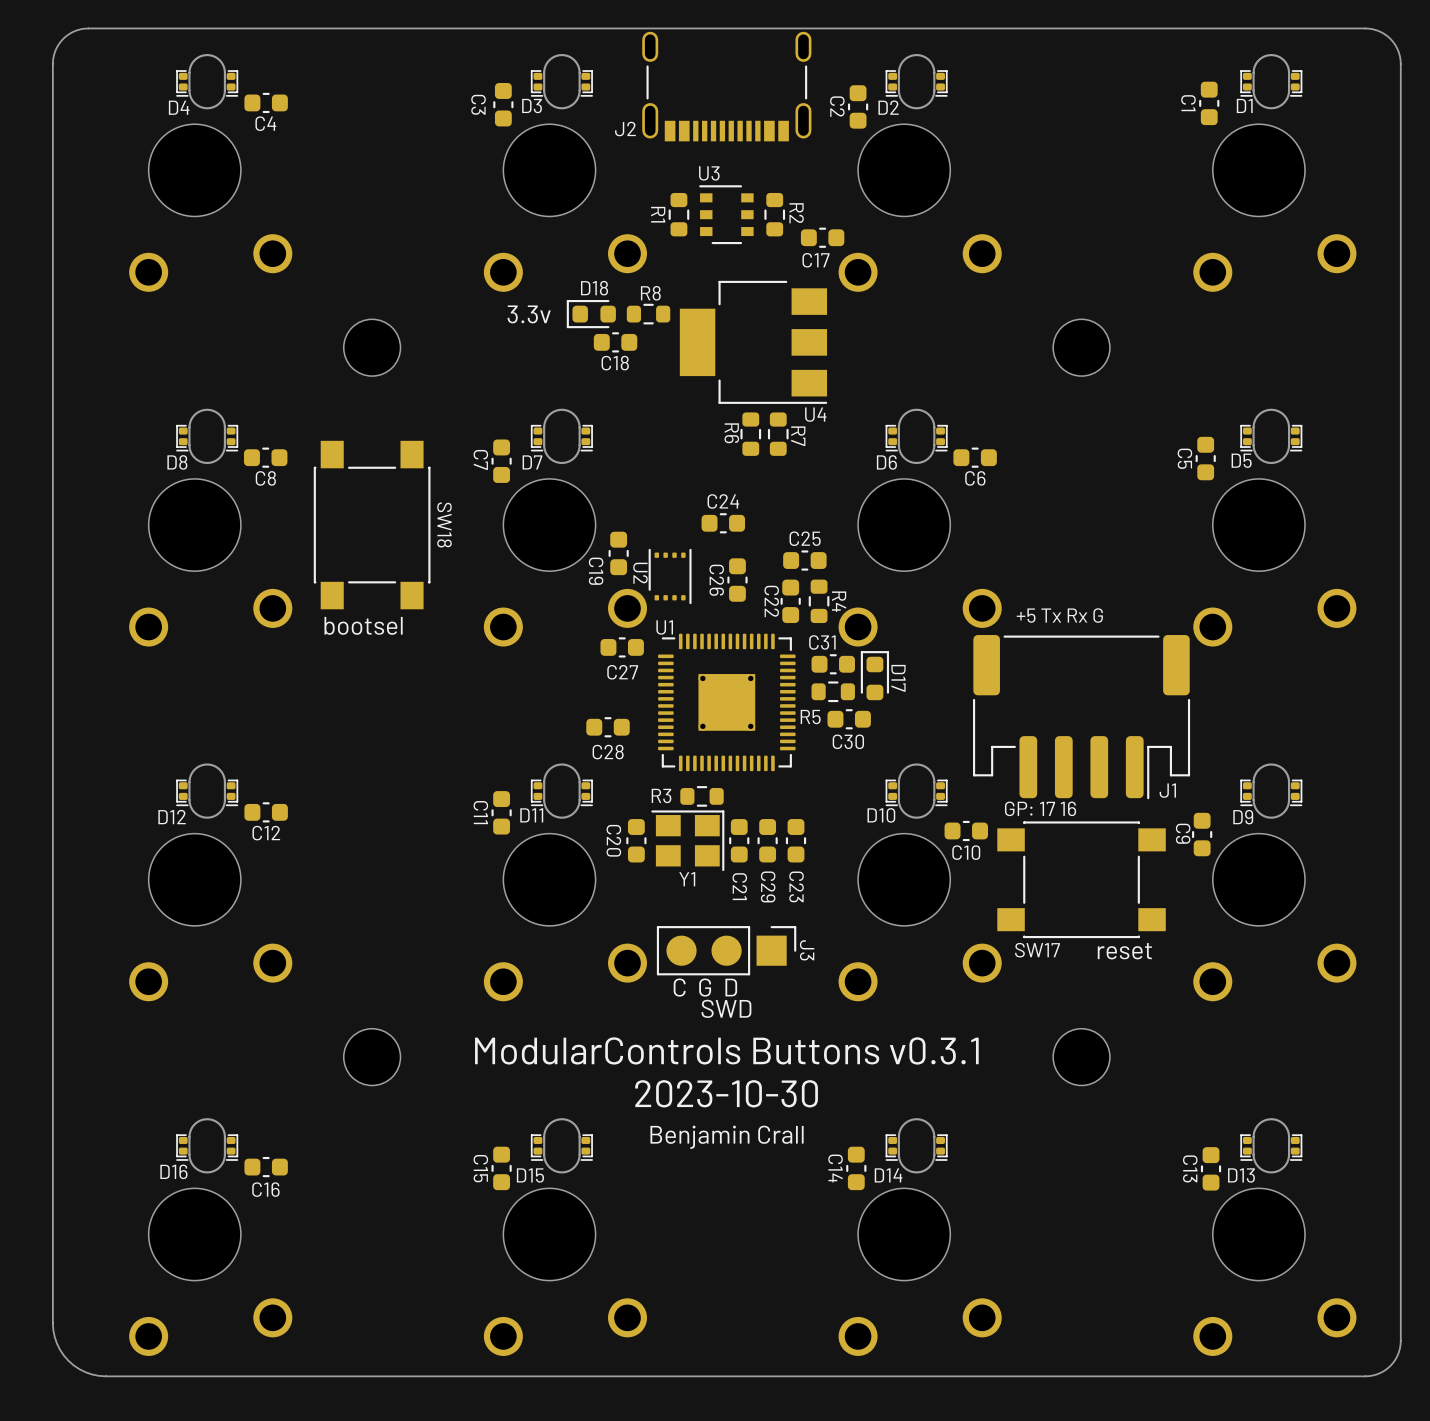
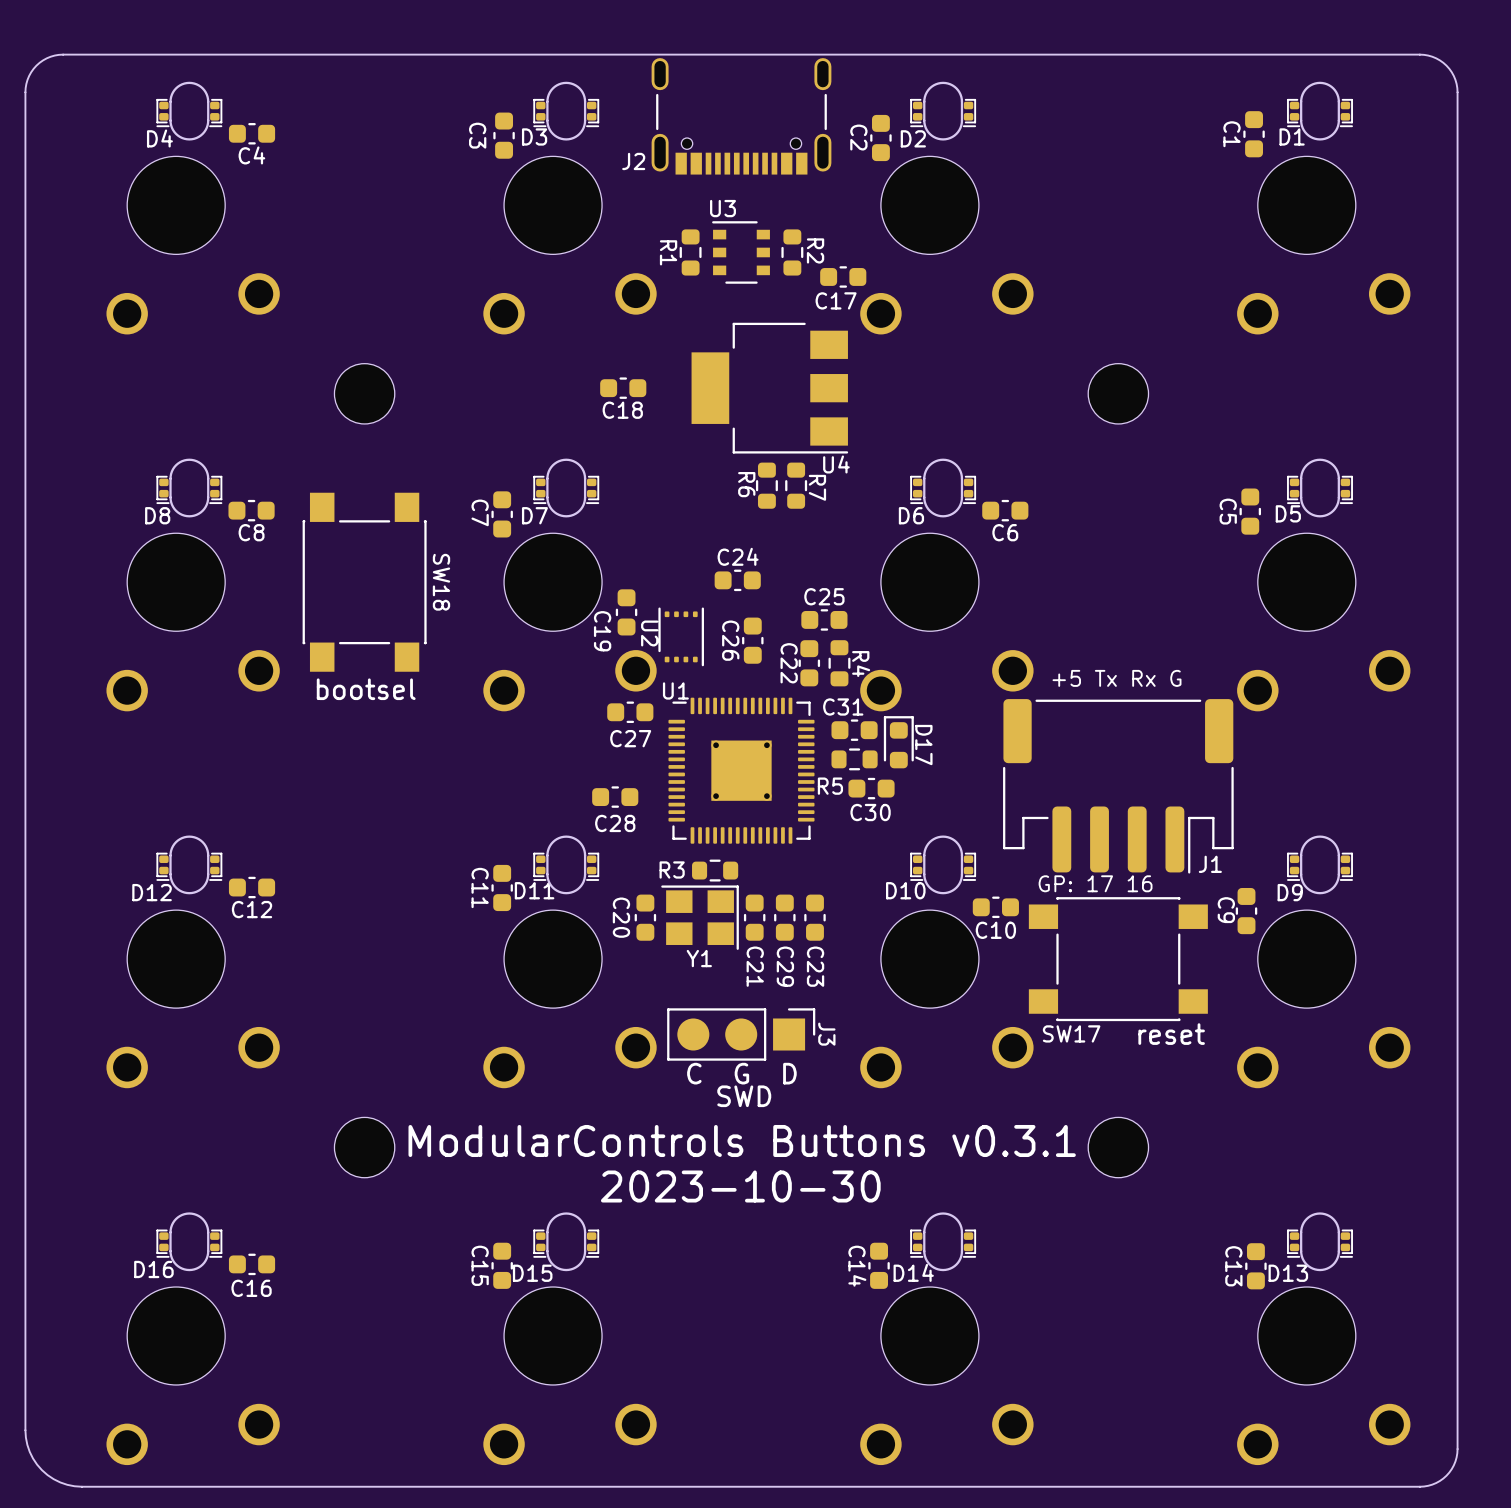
J2 footprint: [642, 31, 812, 142] -> [651, 58, 832, 175]
text: 3.3v (529, 314) -> none
D18: (591, 314) -> none
R8: (648, 314) -> none
text: Benjamin Crall (727, 1137) -> none

